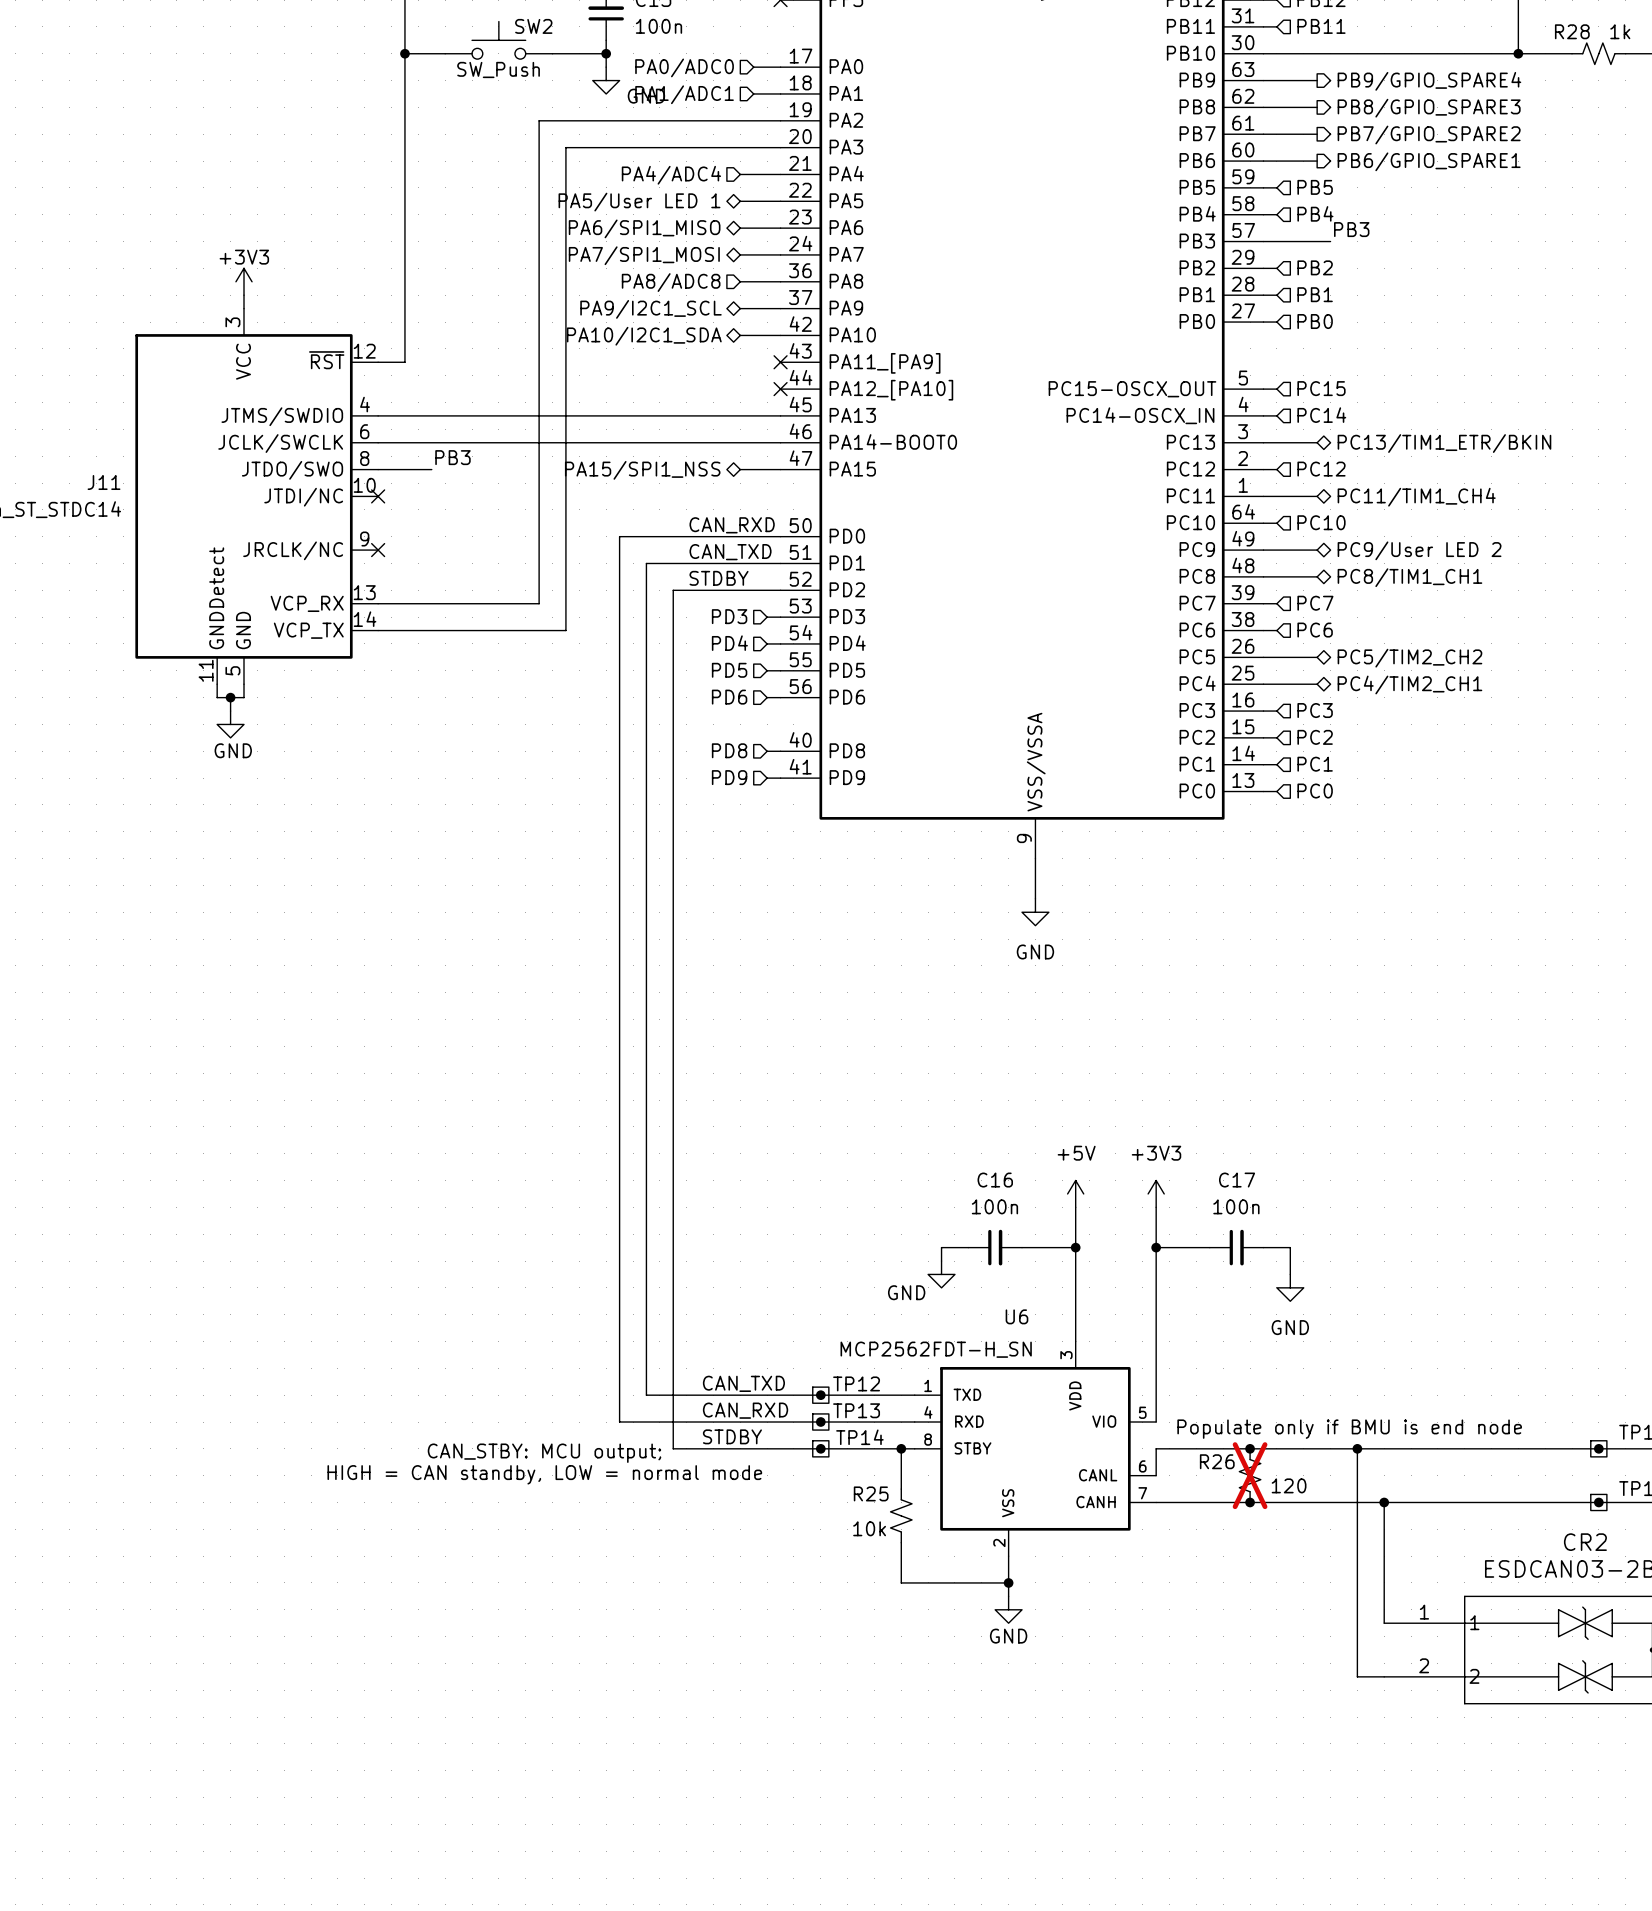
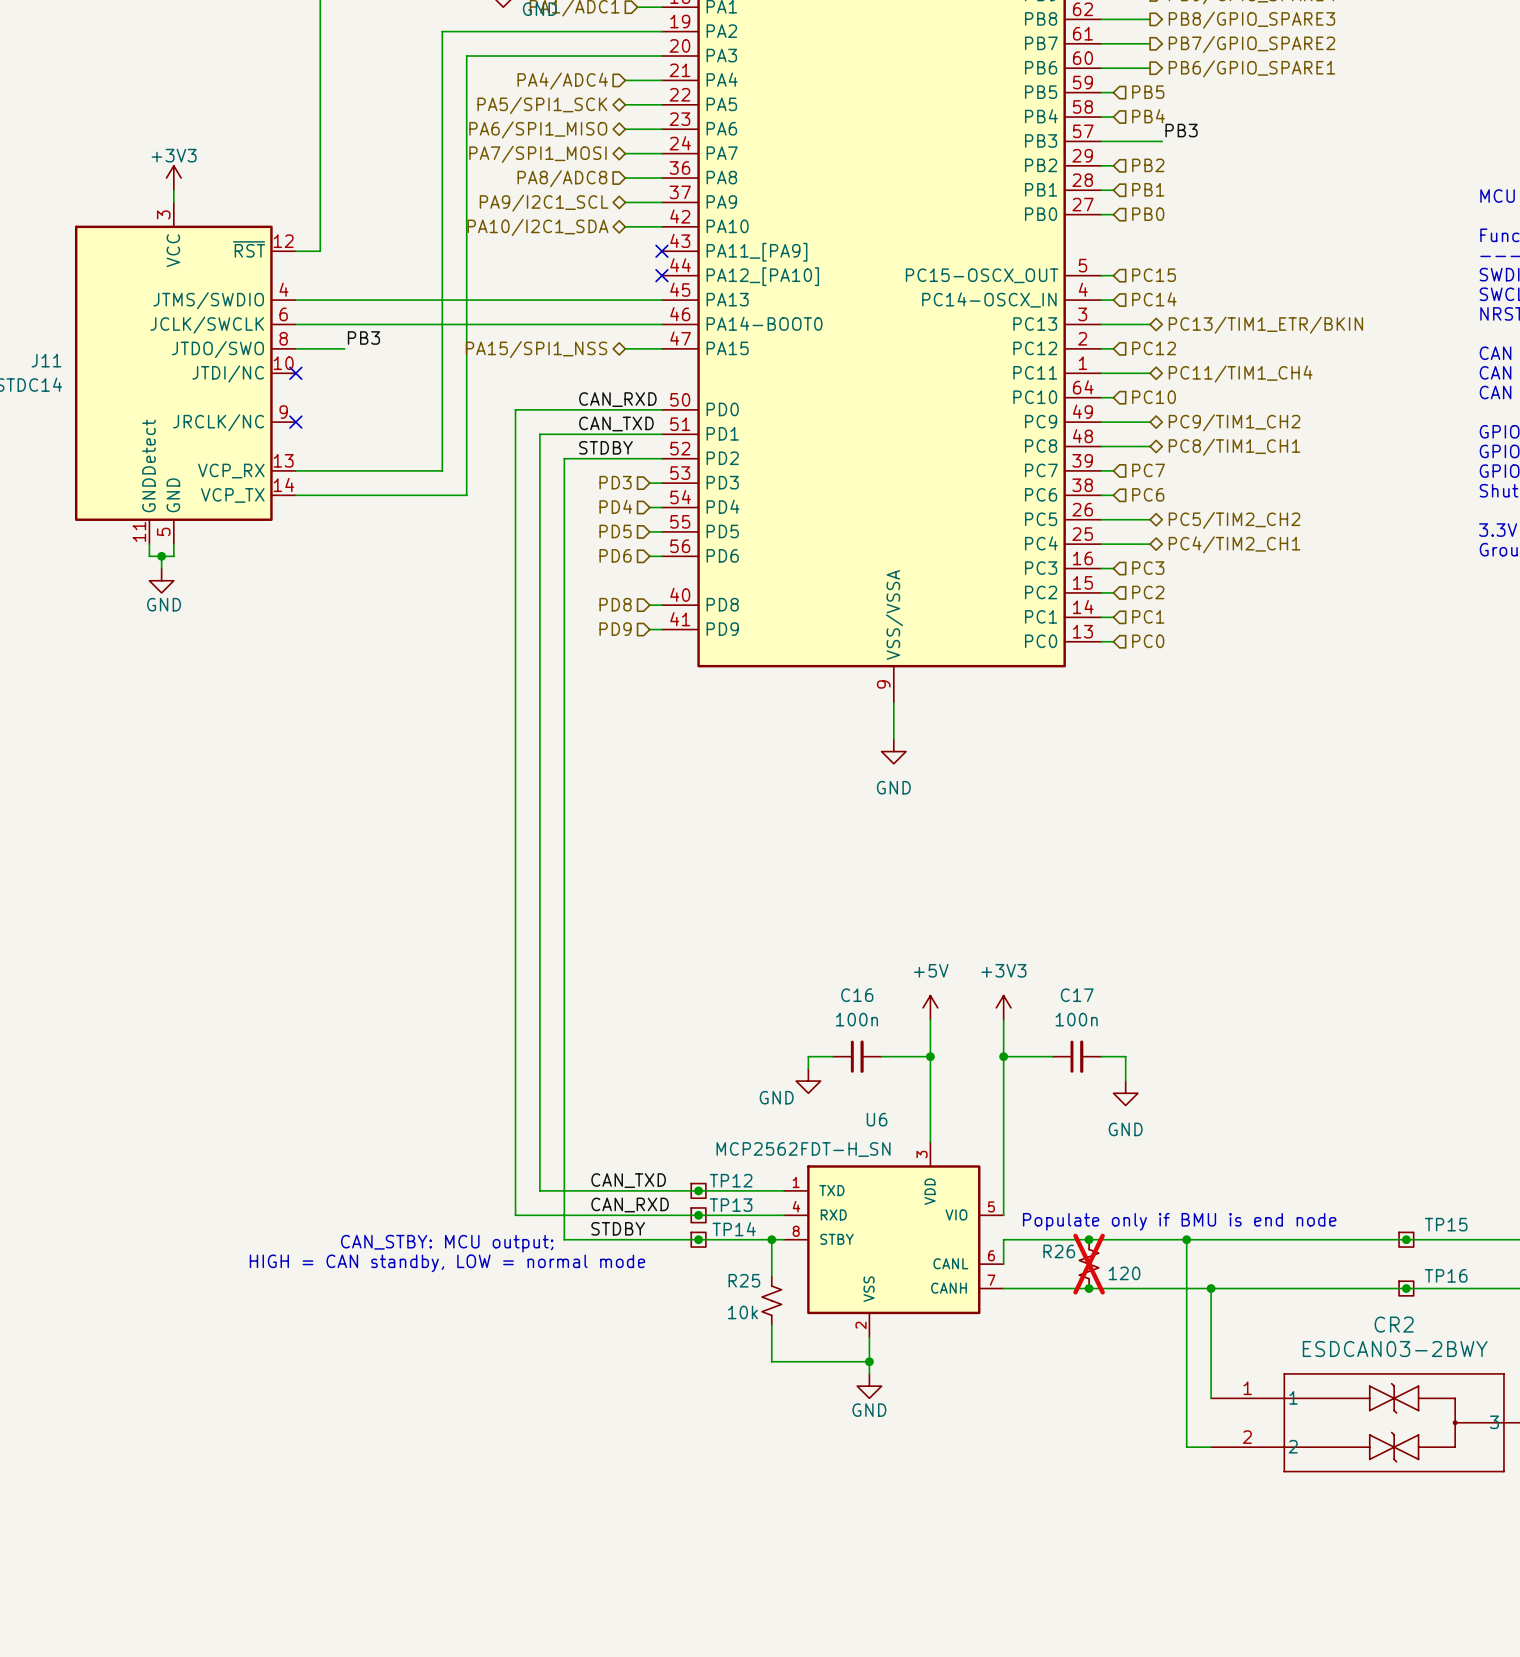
hierarchical label: PA5/User LED 1 (639, 202) -> PA5/SPI1_SCK (542, 105)
hierarchical label: PC9/User LED 2 (1419, 550) -> PC9/TIM1_CH2 (1234, 422)

